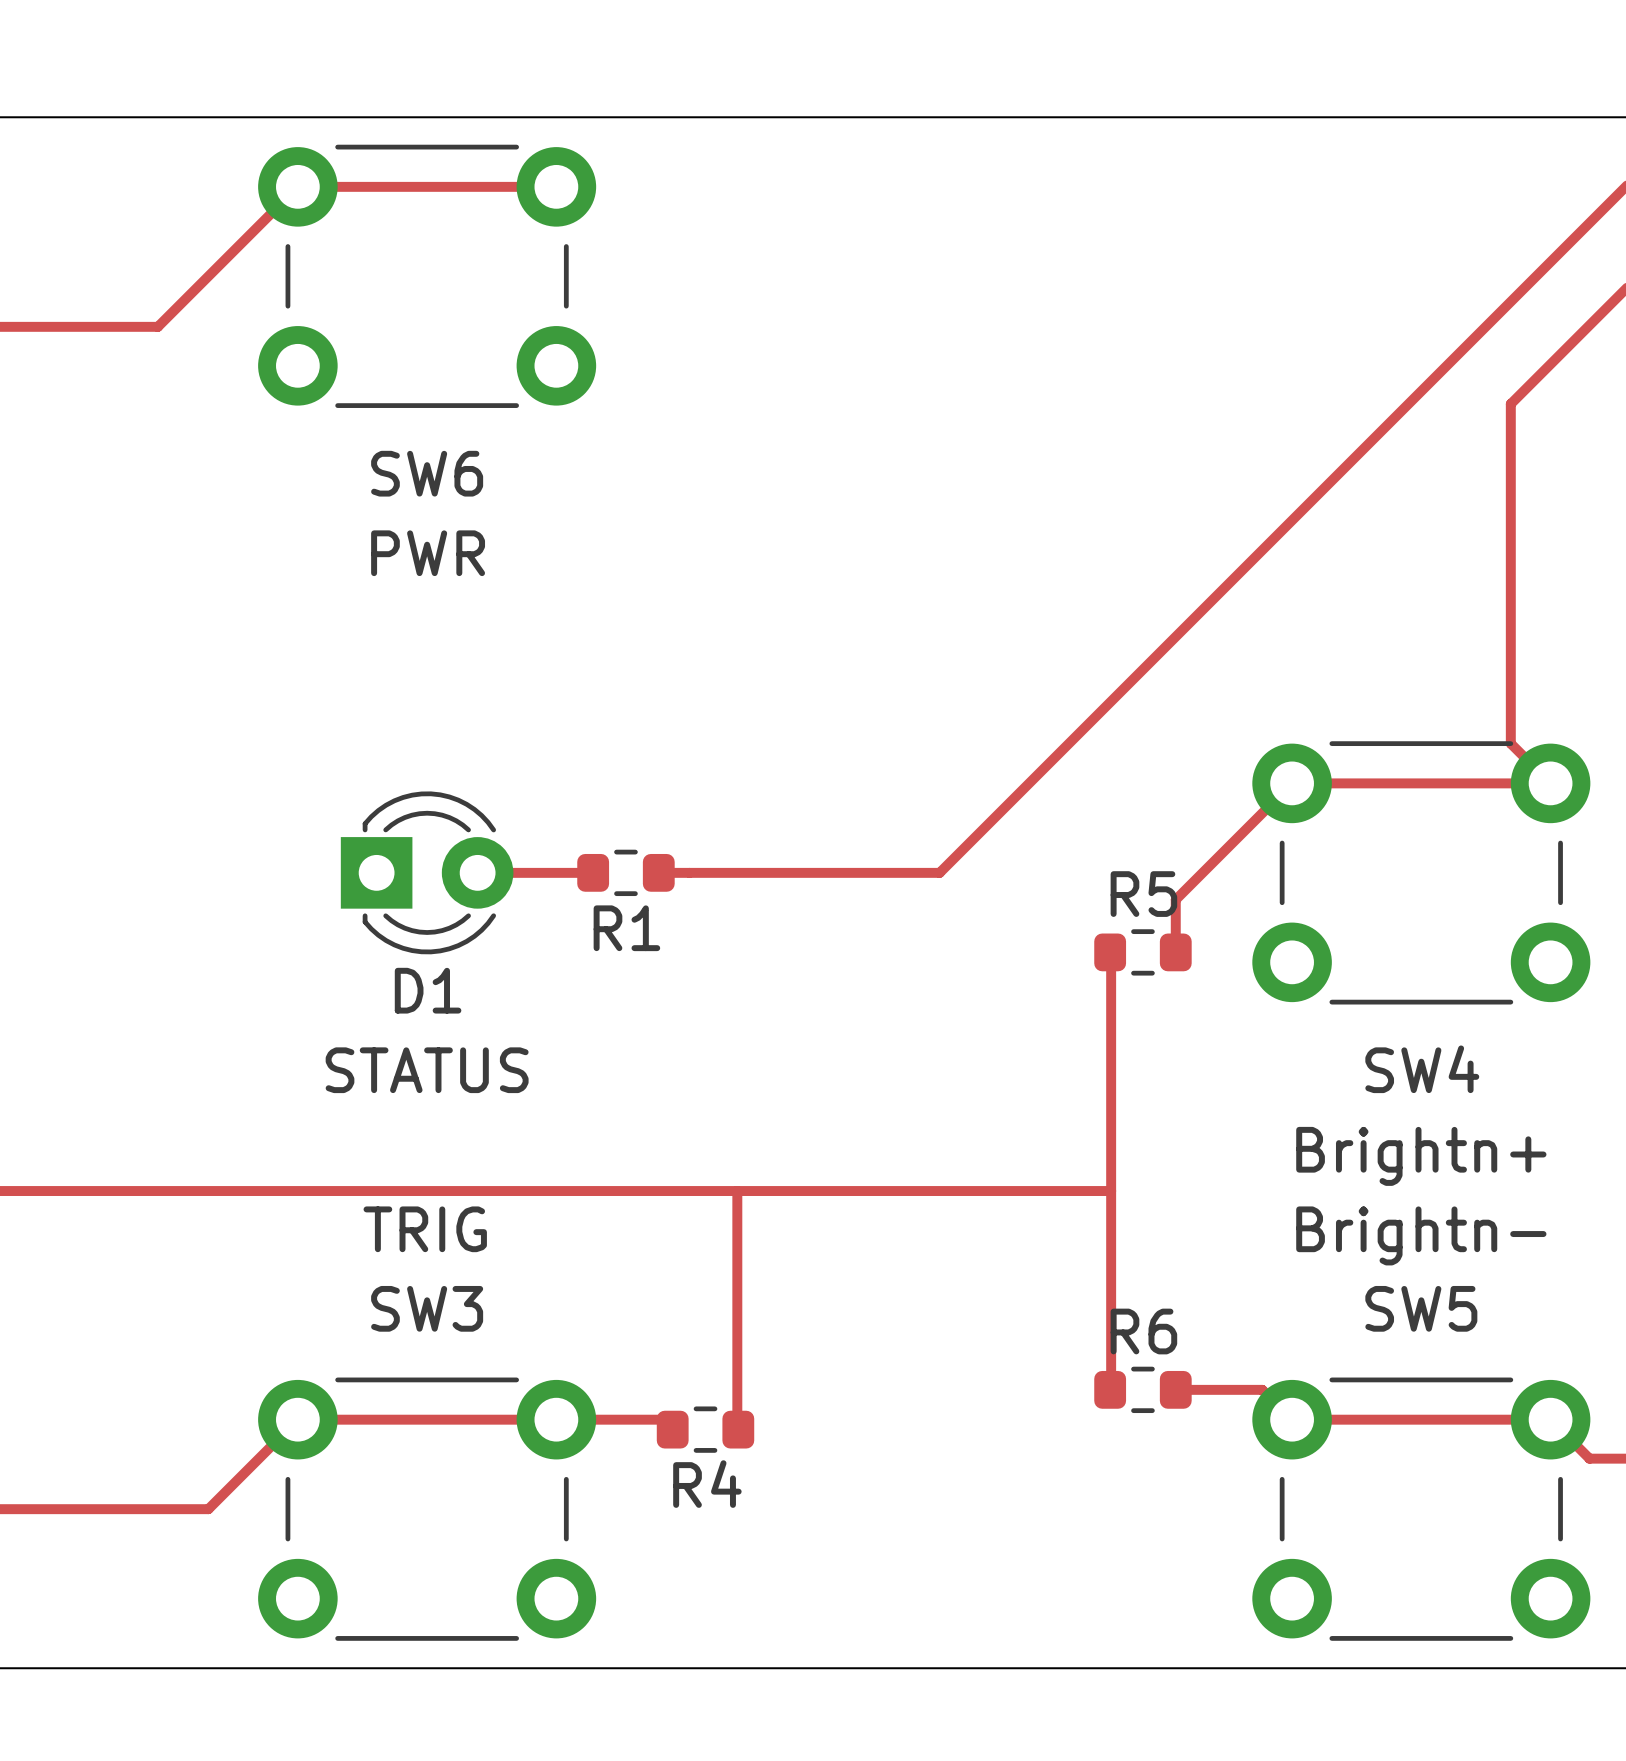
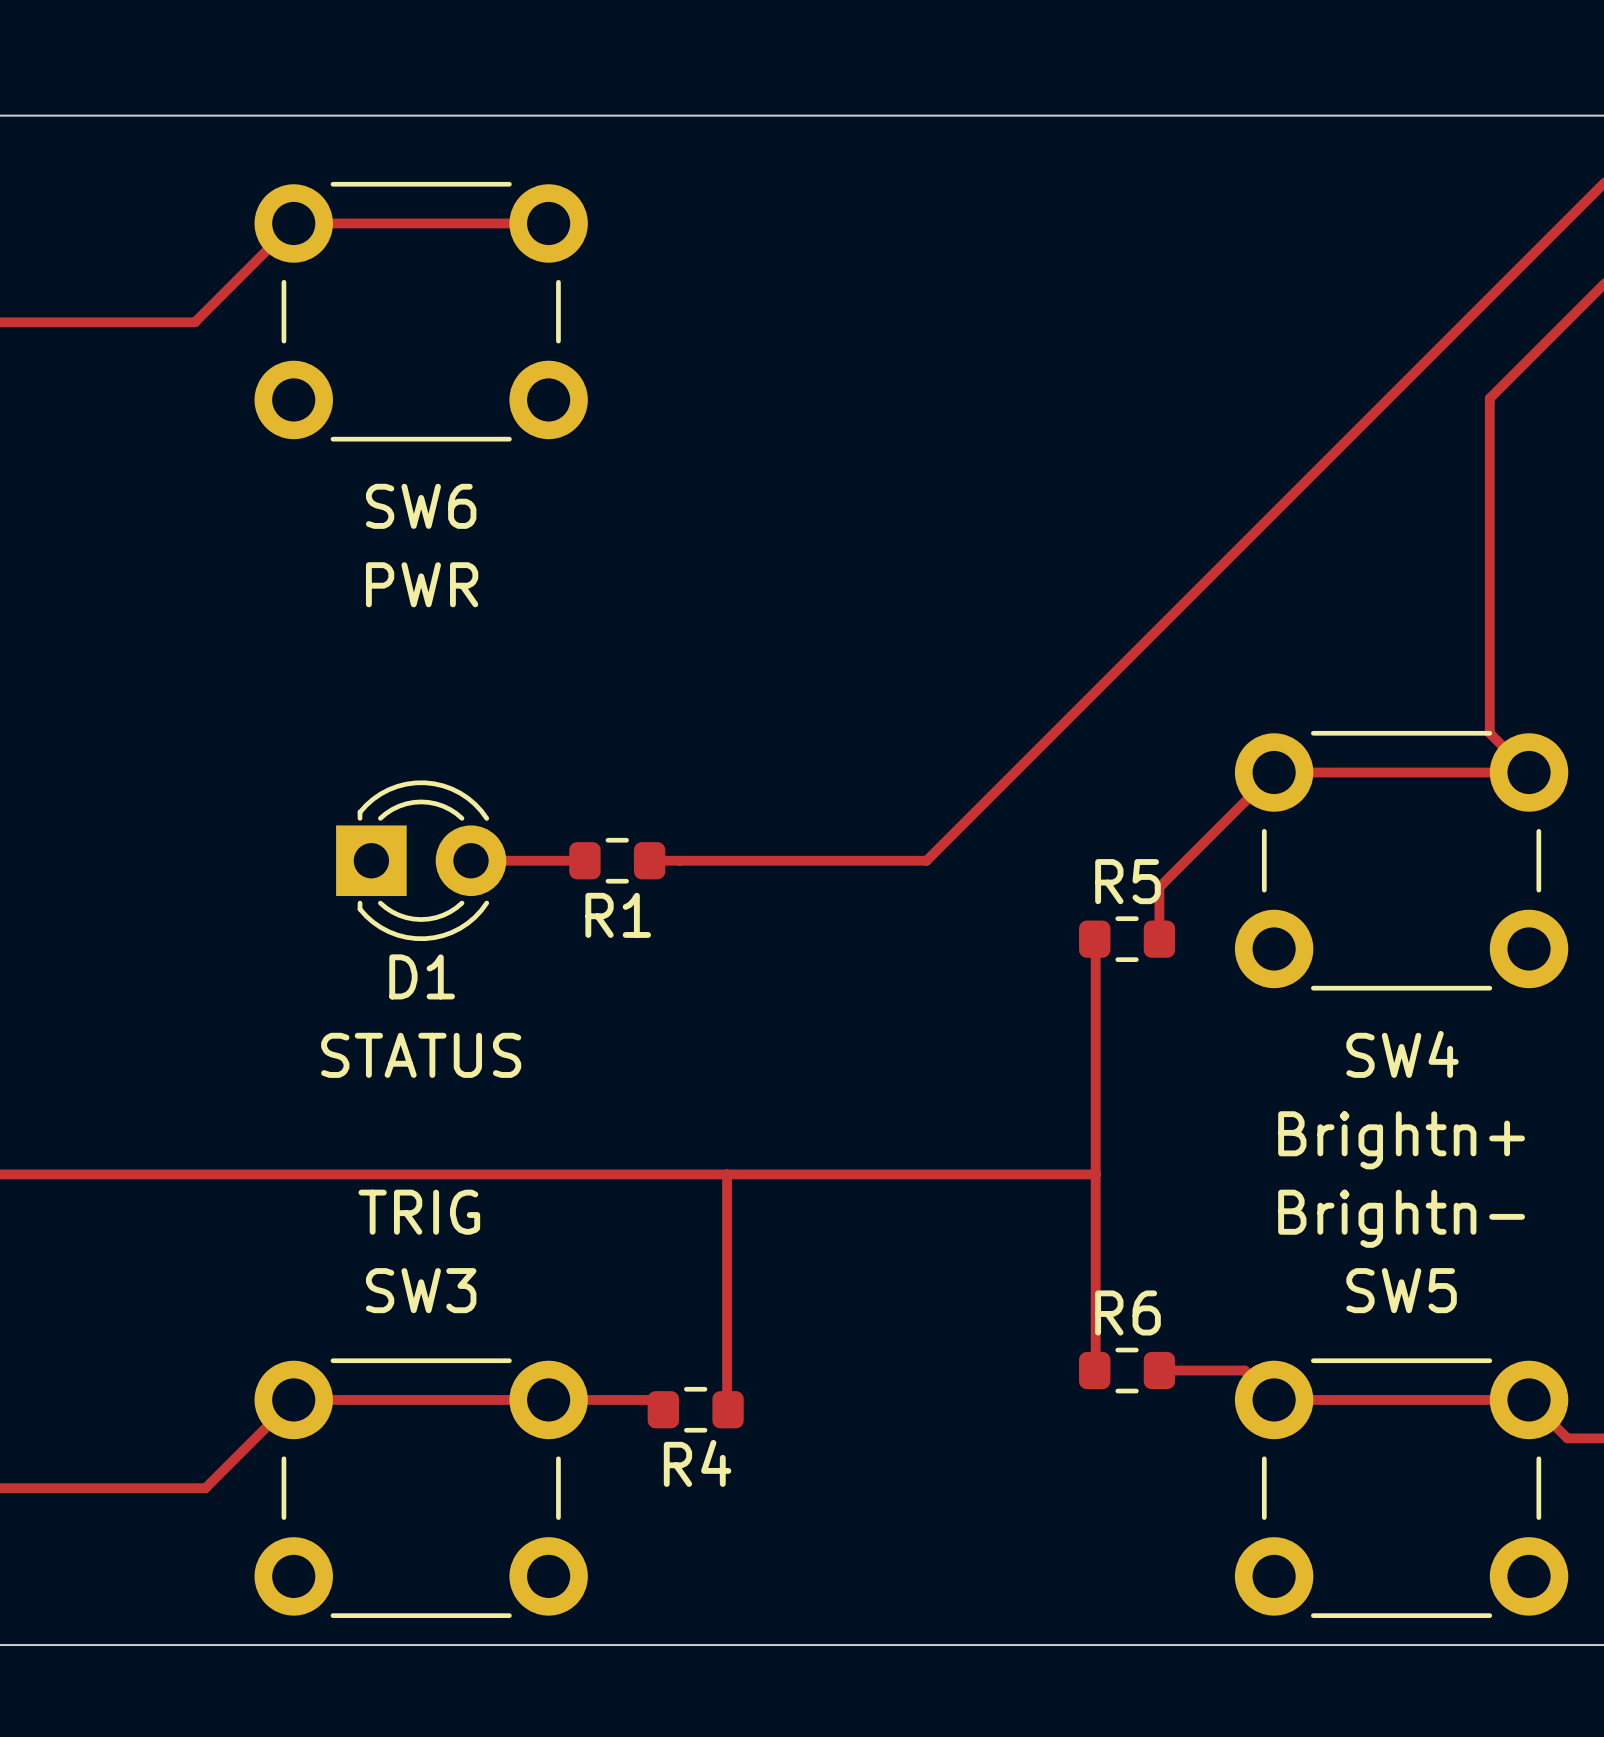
track: (556, 186) (297, 186) (157, 326) -> (548, 223) (293, 223) (194, 322) (155, 322)
SW6 position: (427, 276) -> (421, 311)
text position: PWR (428, 553) -> PWR (422, 584)

